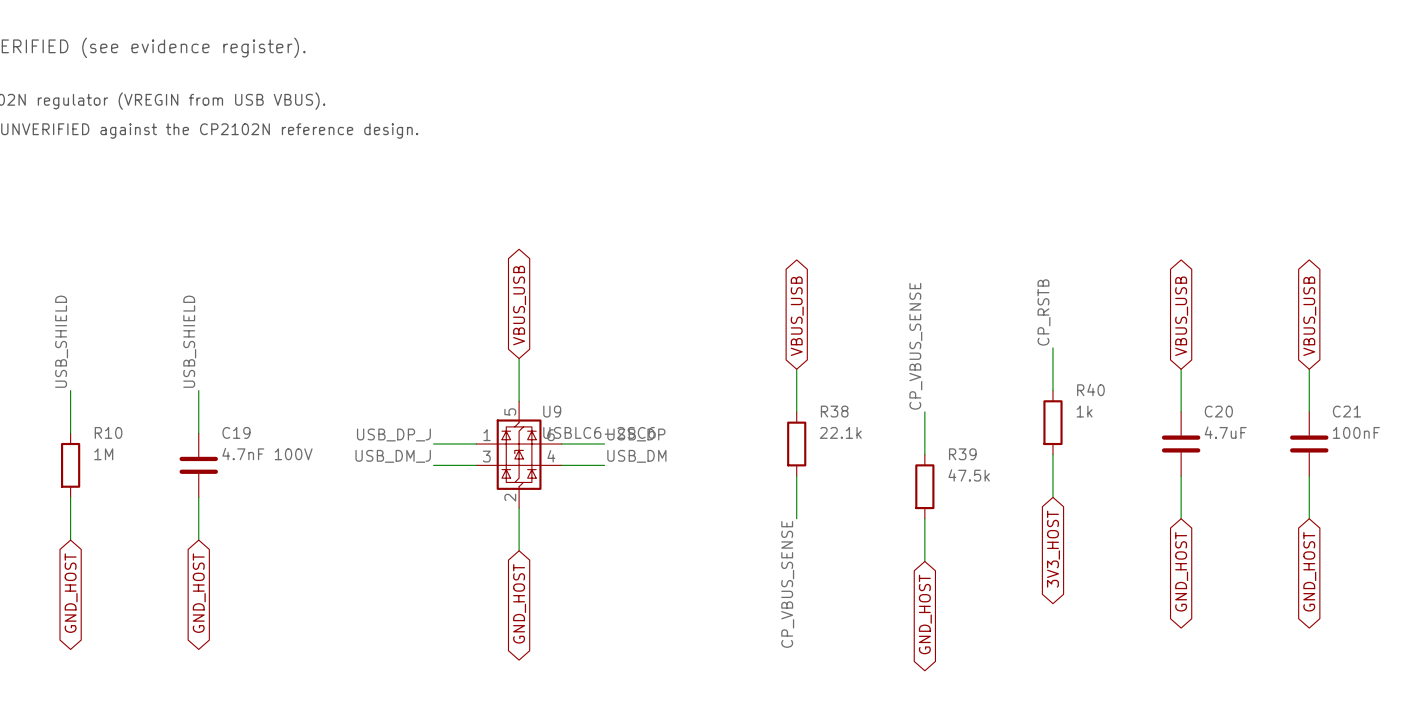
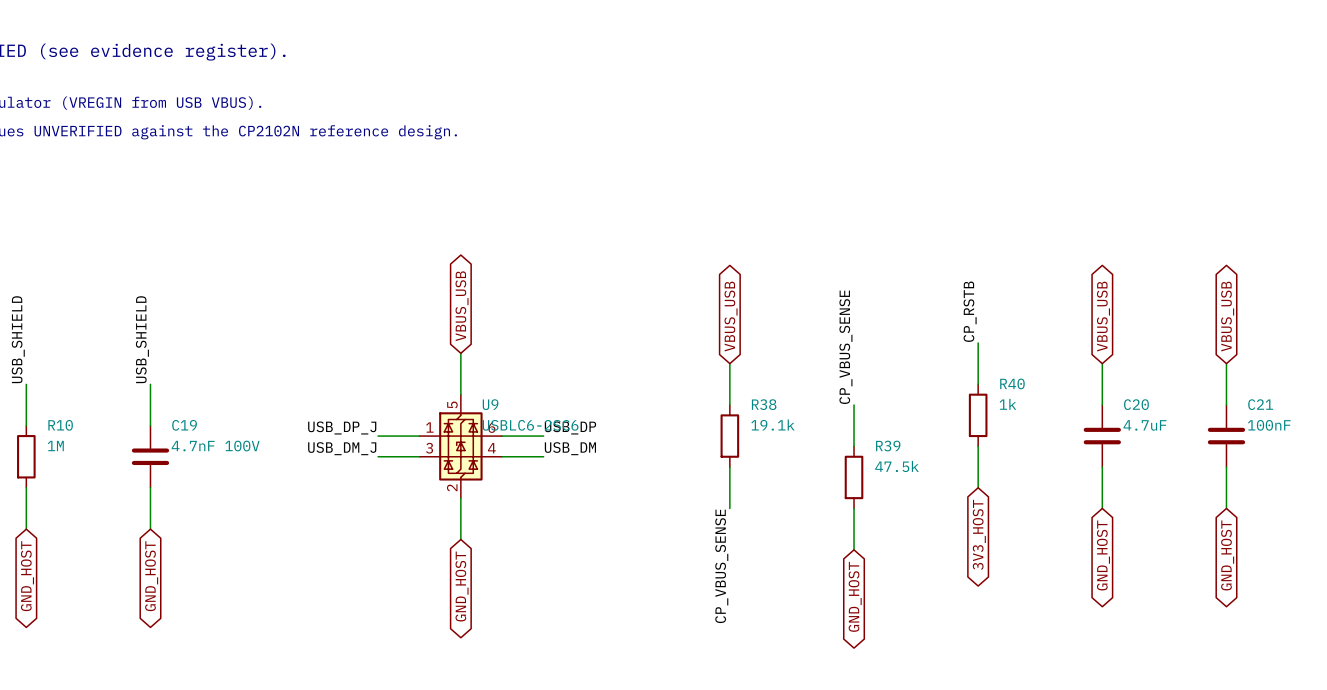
R38 value: 22.1k (840, 432) -> 19.1k (772, 425)

